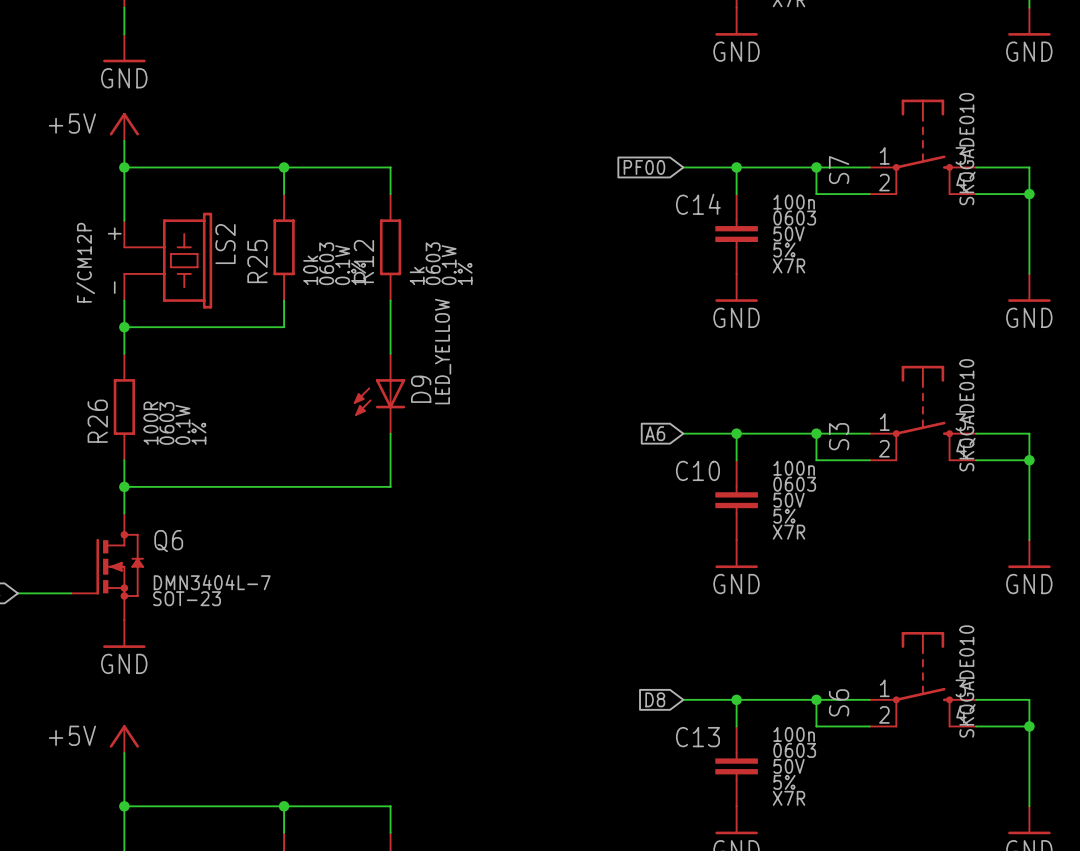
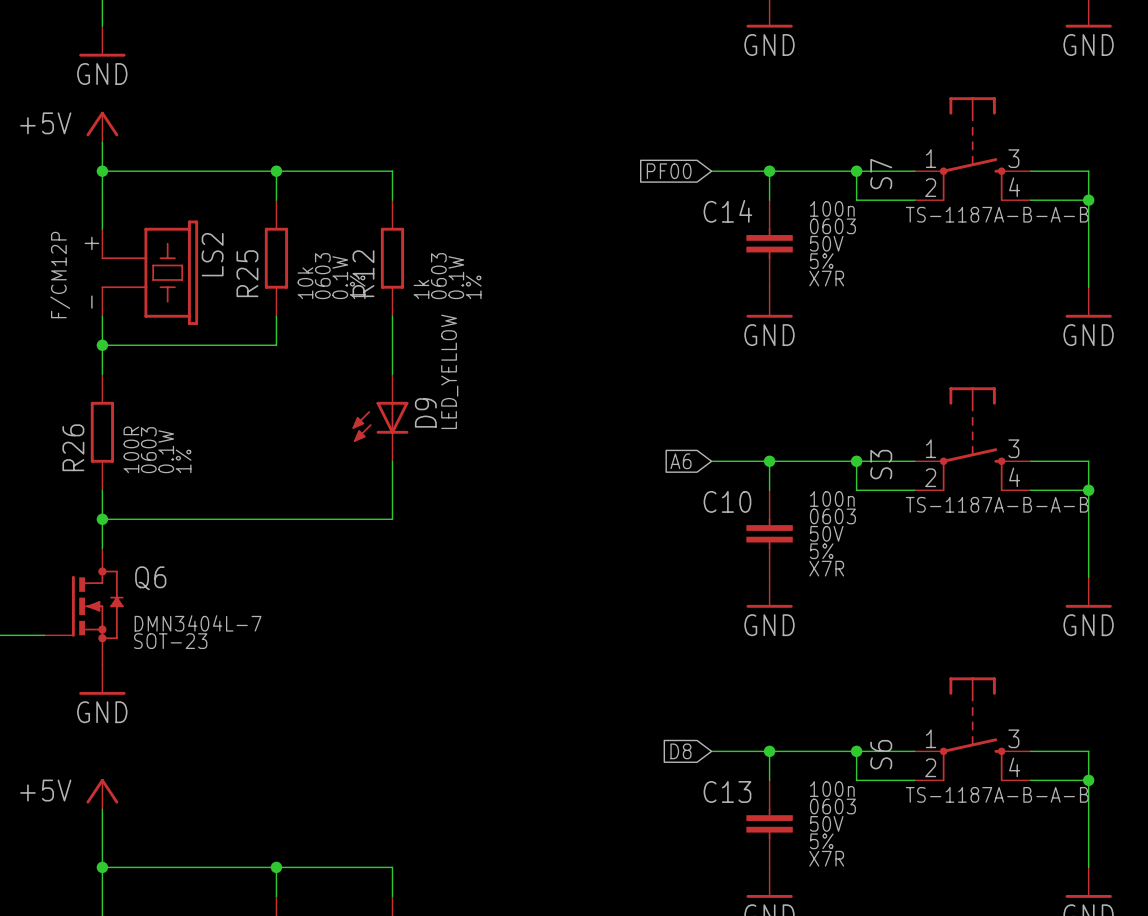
S7 value: SKQGADE010 (967, 149) -> TS-1187A-B-A-B (997, 214)
S3 value: SKQGADE010 (967, 415) -> TS-1187A-B-A-B (997, 504)
S6 value: SKQGADE010 (967, 681) -> TS-1187A-B-A-B (997, 794)

